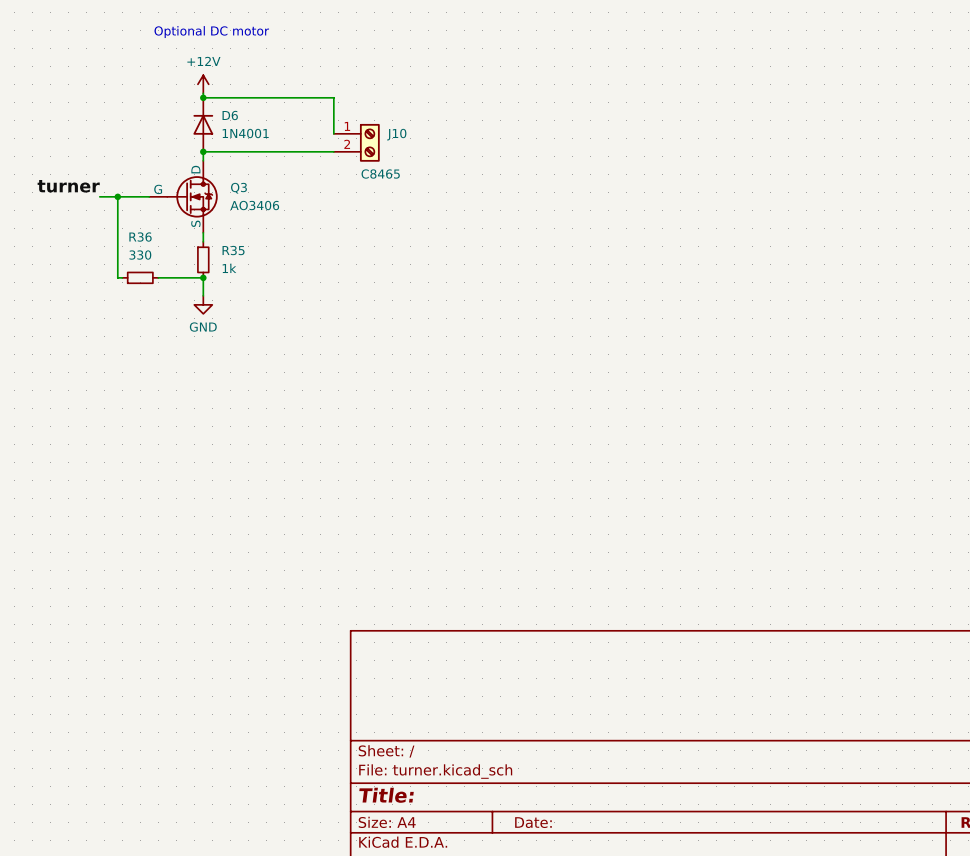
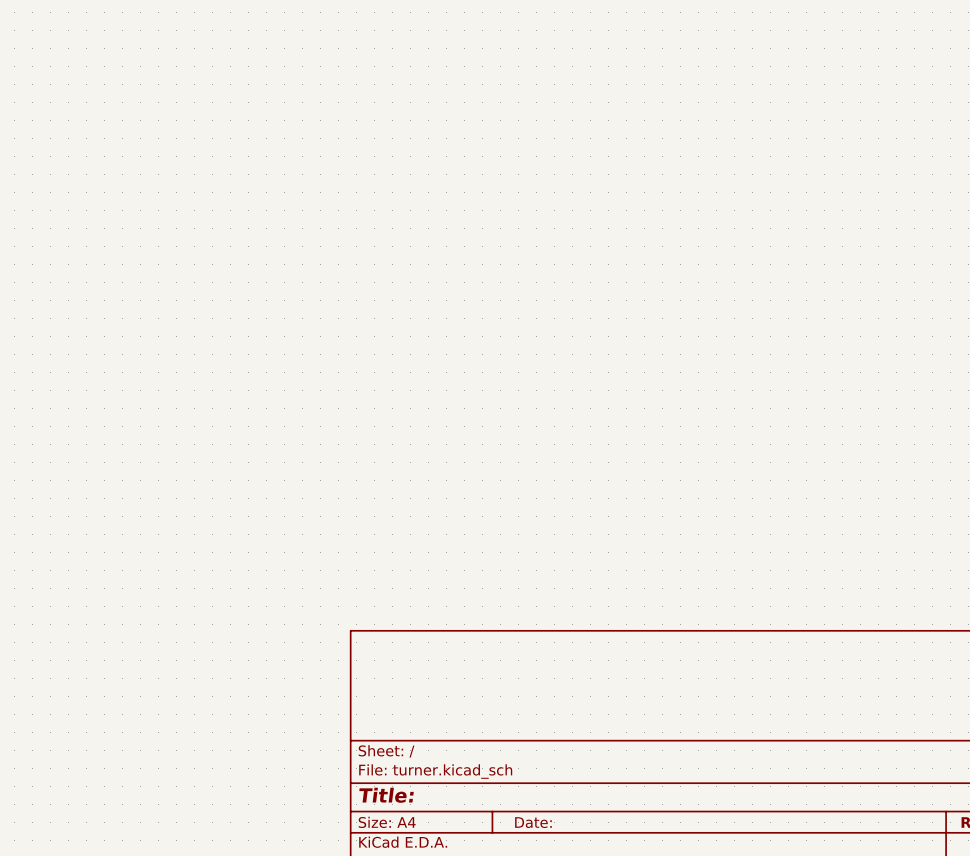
text: Optional DC motor (211, 32) -> none
power symbol: +12V (203, 84) -> none
wire: (203, 93) (203, 97) (333, 97) (333, 133) -> none
junction: (203, 97) -> none
D6: 1N4001 (203, 124) -> none
J10: C8465 (356, 142) -> none
junction: (203, 151) -> none
wire: (333, 151) (203, 151) (203, 160) -> none
label: turner (68, 186) -> none
wire: (99, 196) (149, 196) -> none
wire: (117, 196) (117, 277) (122, 277) -> none
junction: (117, 196) -> none
Q3: AO3406 (183, 196) -> none
wire: (203, 232) (203, 241) -> none
R35: 1k (203, 259) -> none
R36: 330 (140, 277) -> none
wire: (158, 277) (203, 277) (203, 295) -> none
junction: (203, 277) -> none
power symbol: GND (203, 304) -> none

